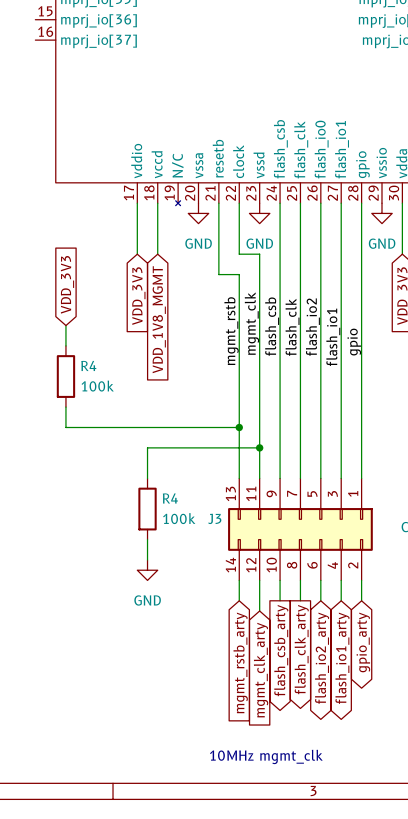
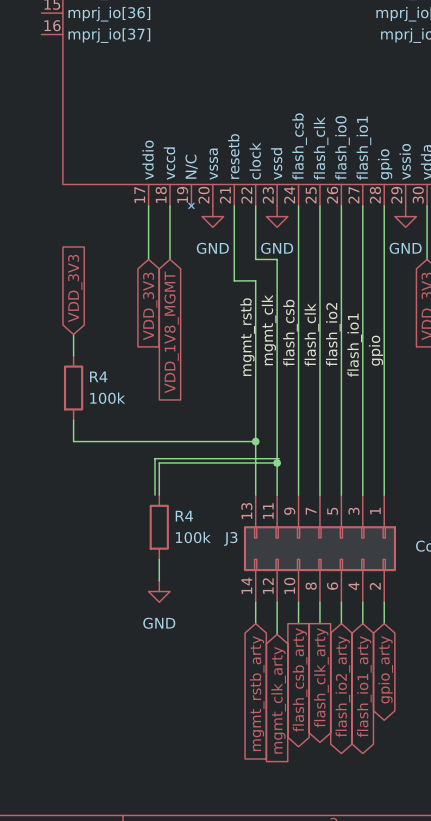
wire: none -> (279, 458) (155, 458) (155, 495)
text: 10MHz mgmt_clk (266, 756) -> none

